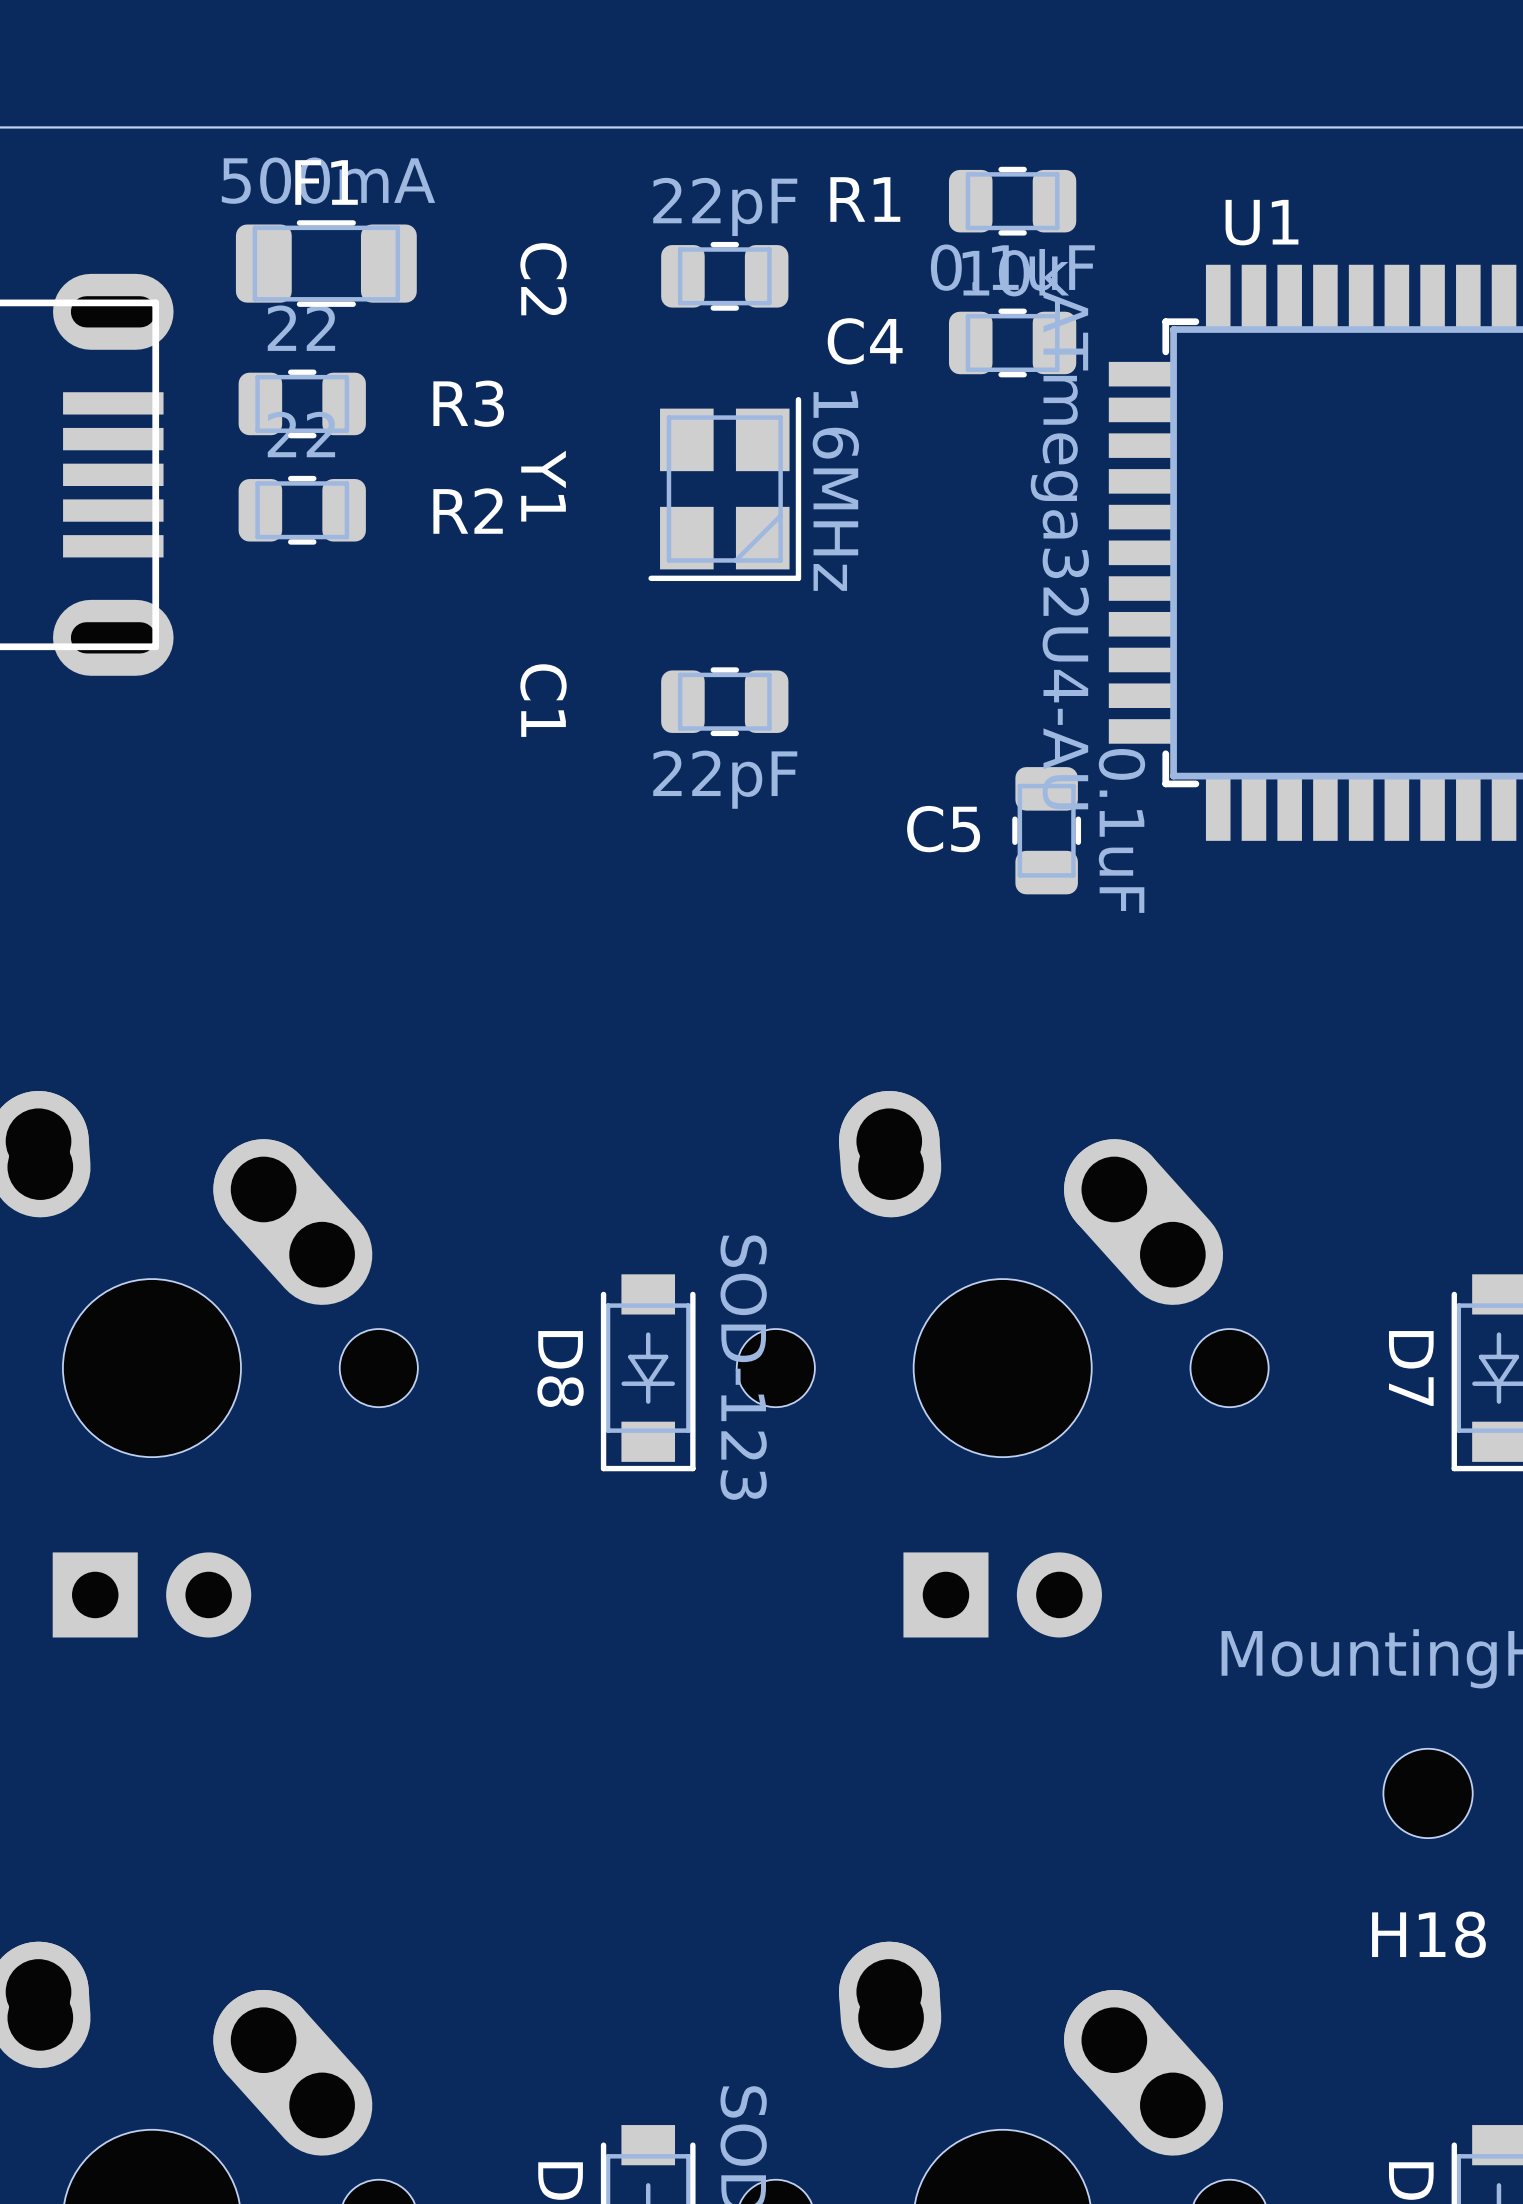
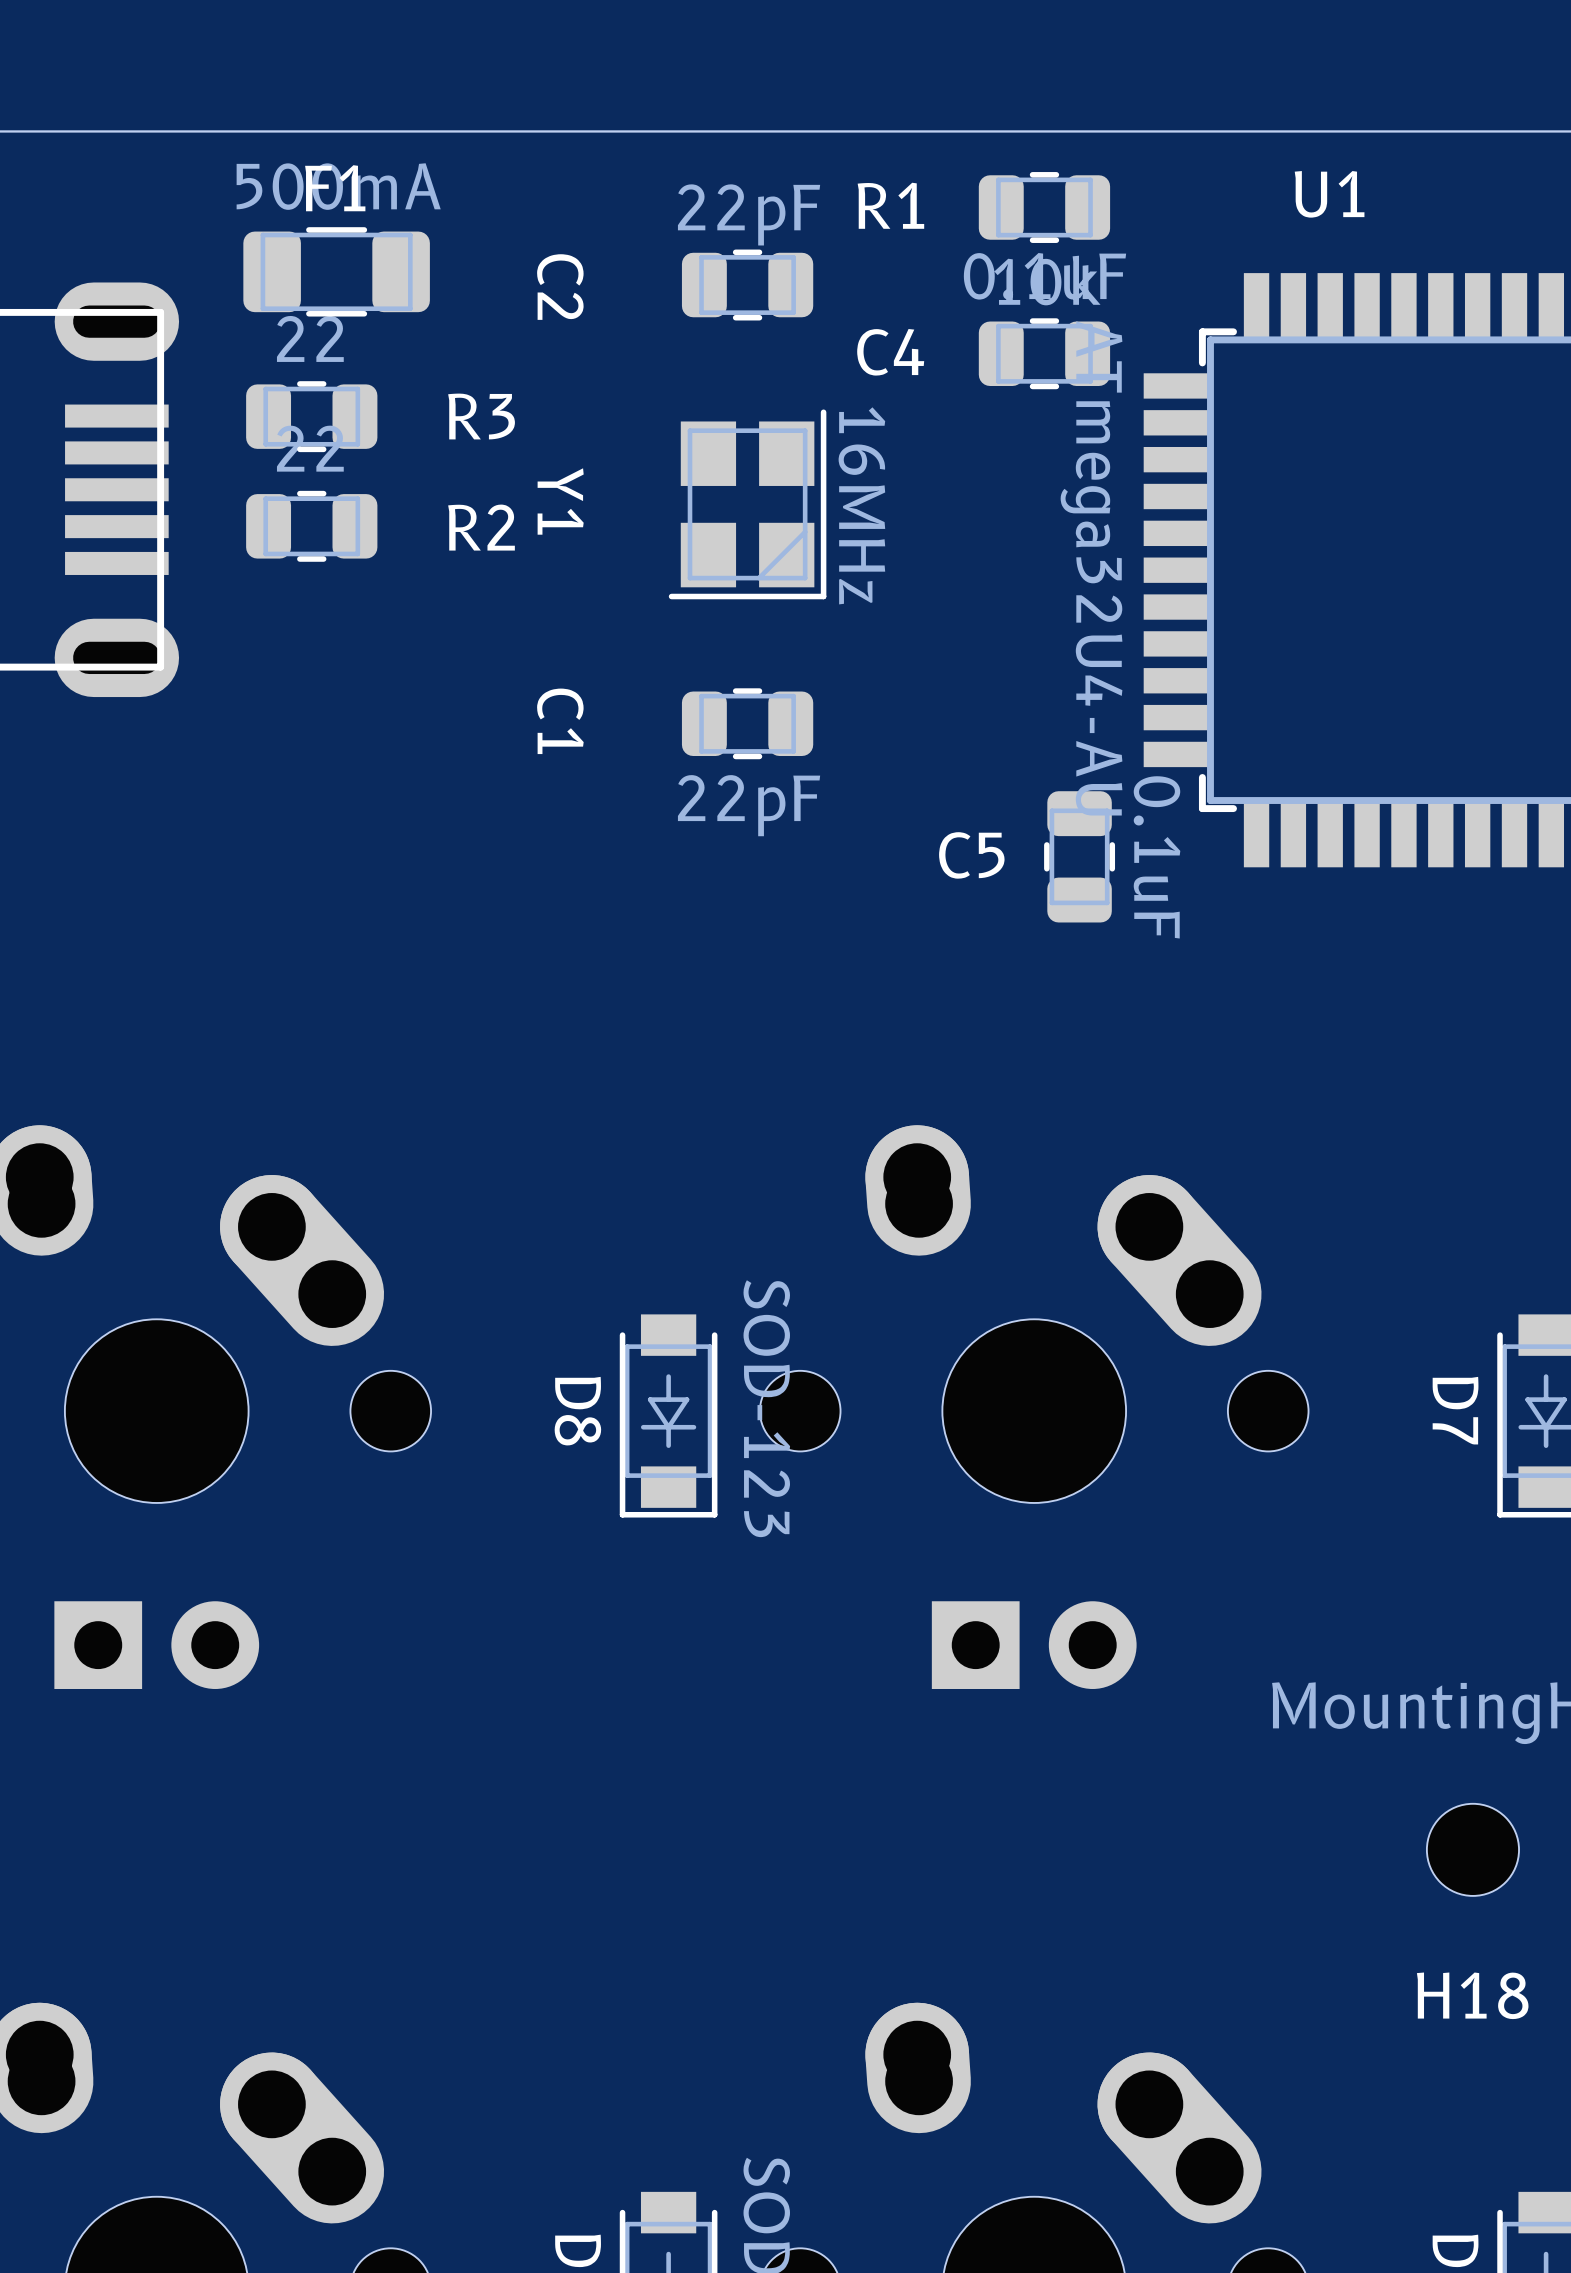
U1 name position: U1 (1262, 222) -> U1 (1329, 194)

